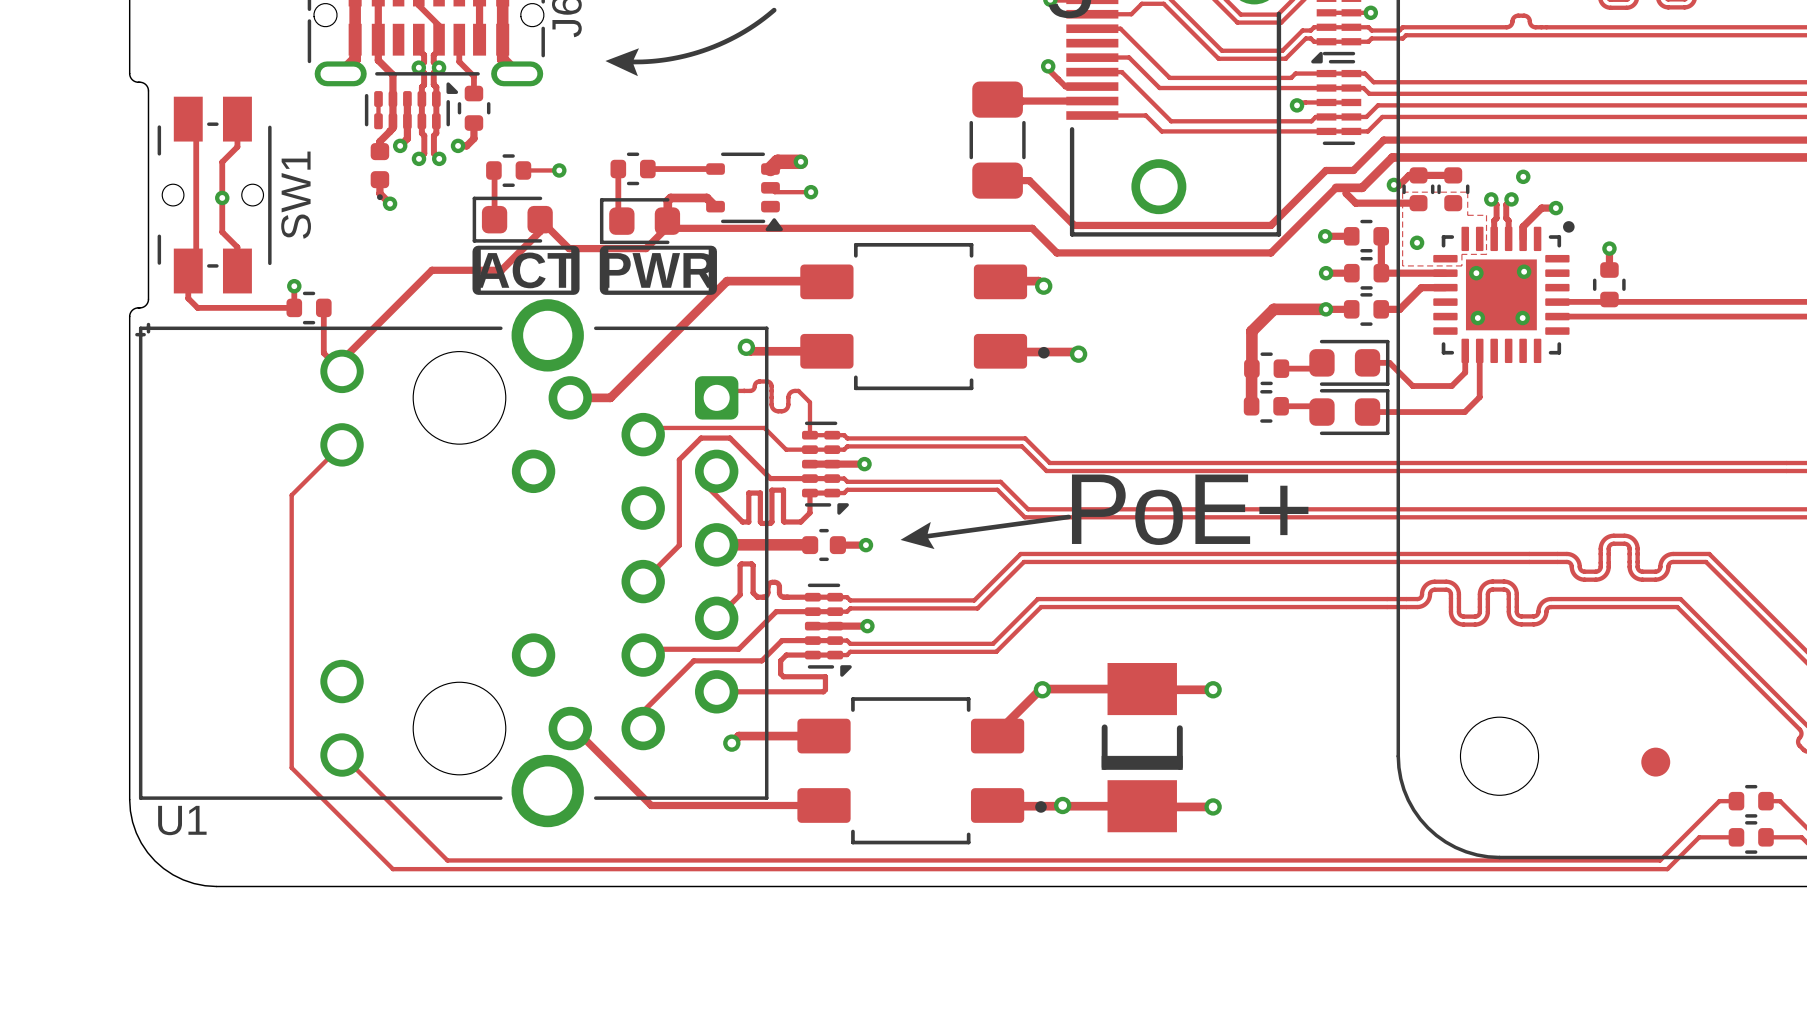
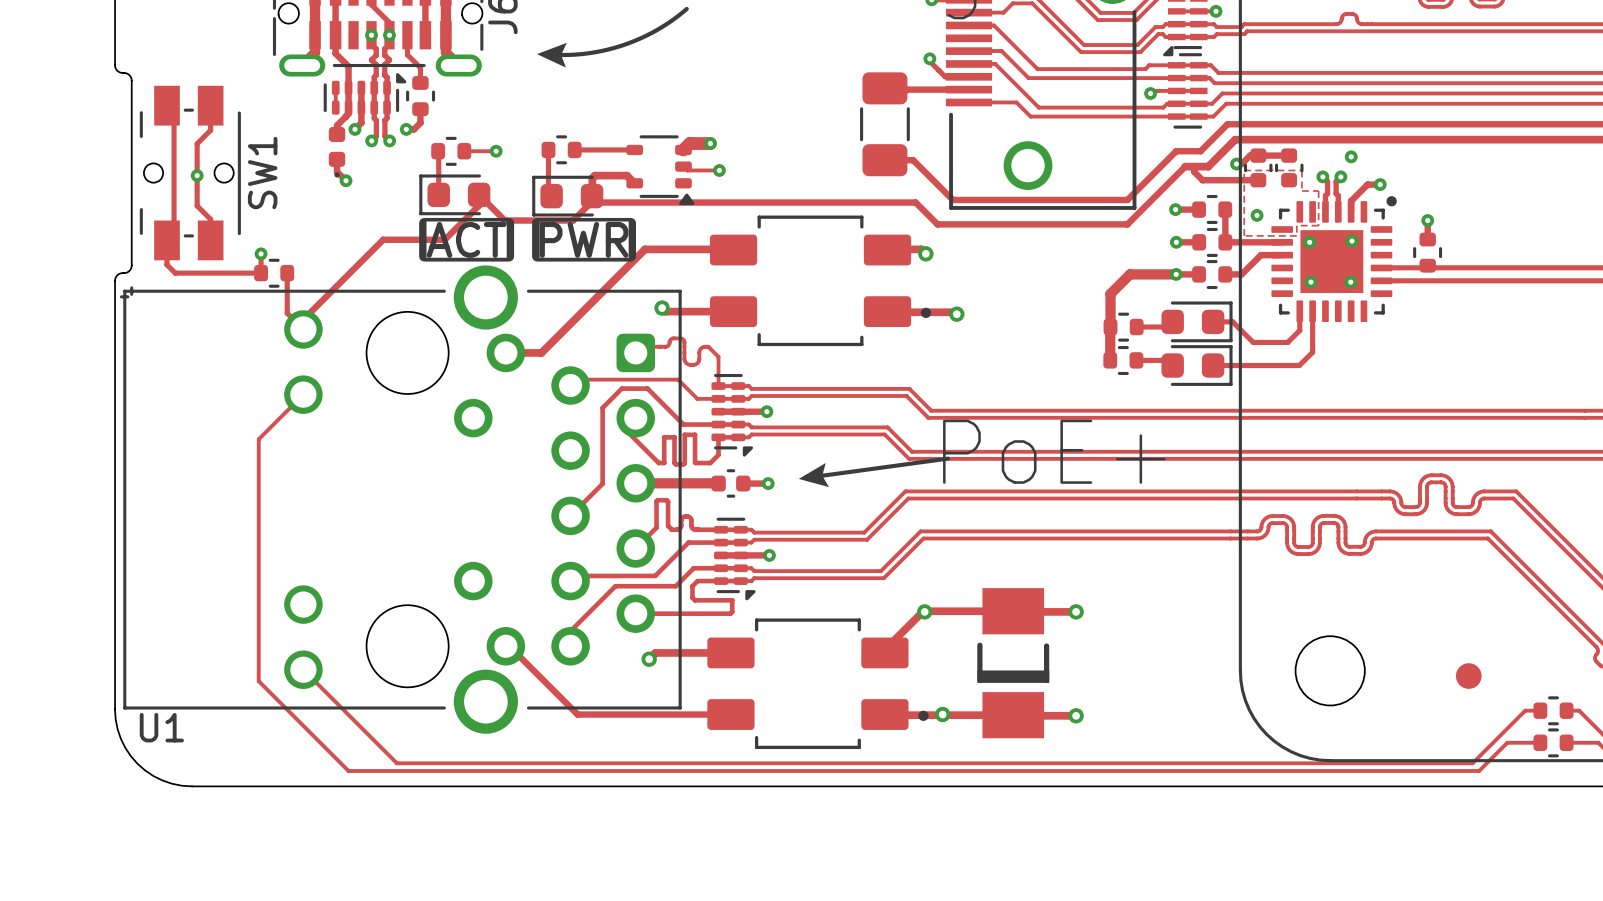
via: none -> (371, 35)
via: none -> (389, 35)
via: (418, 67) -> none
via: (439, 67) -> none

